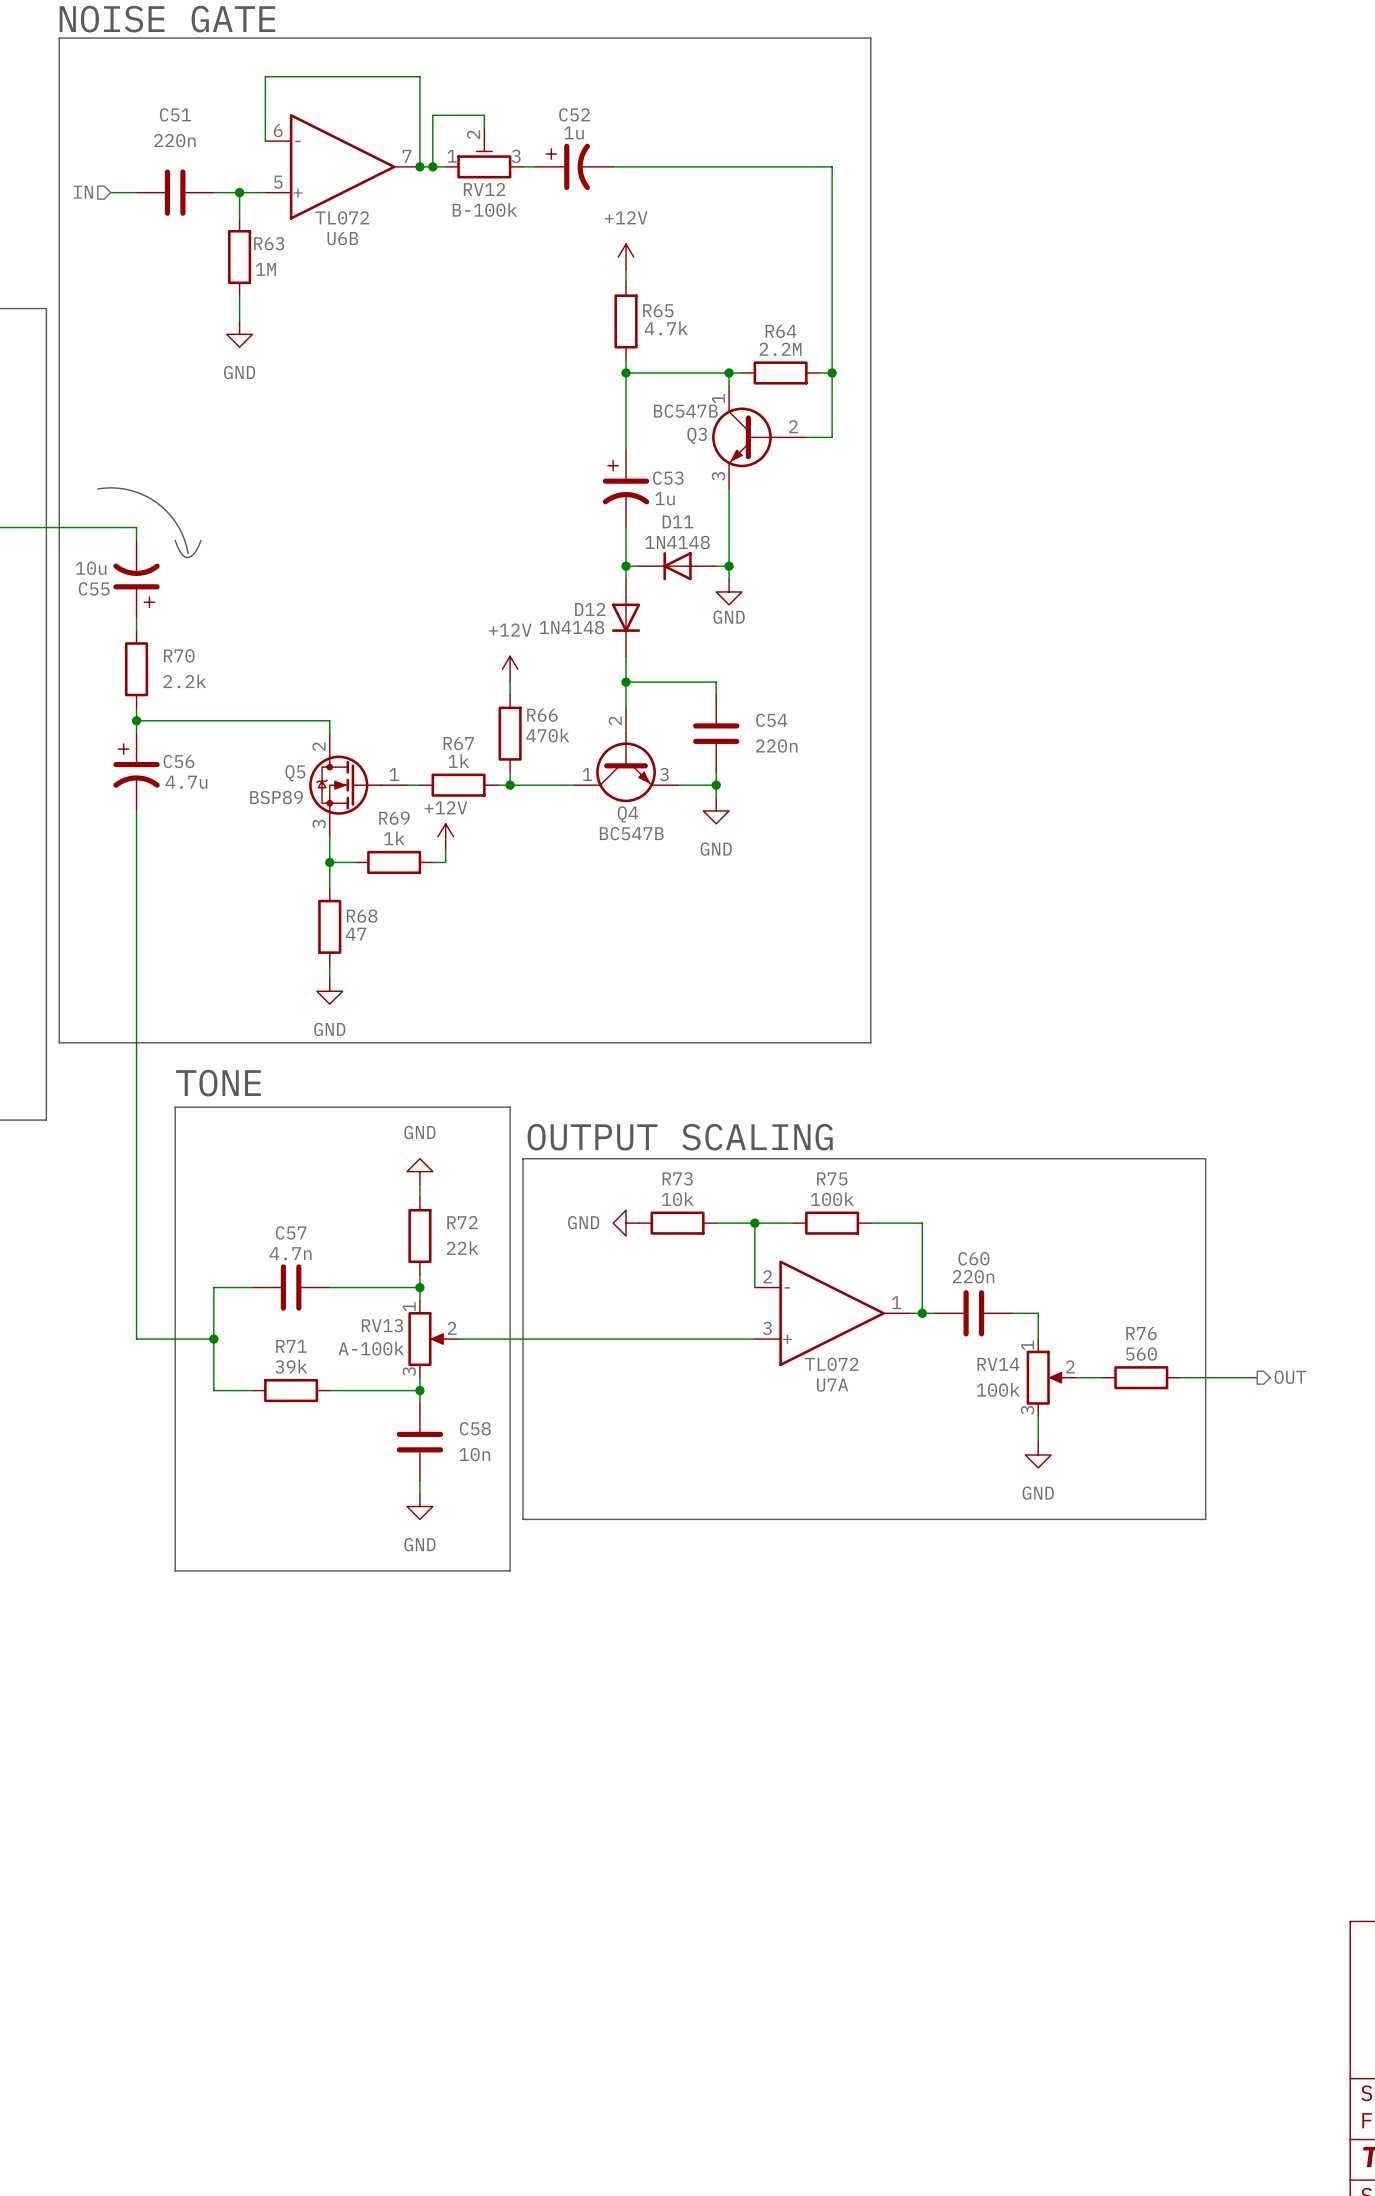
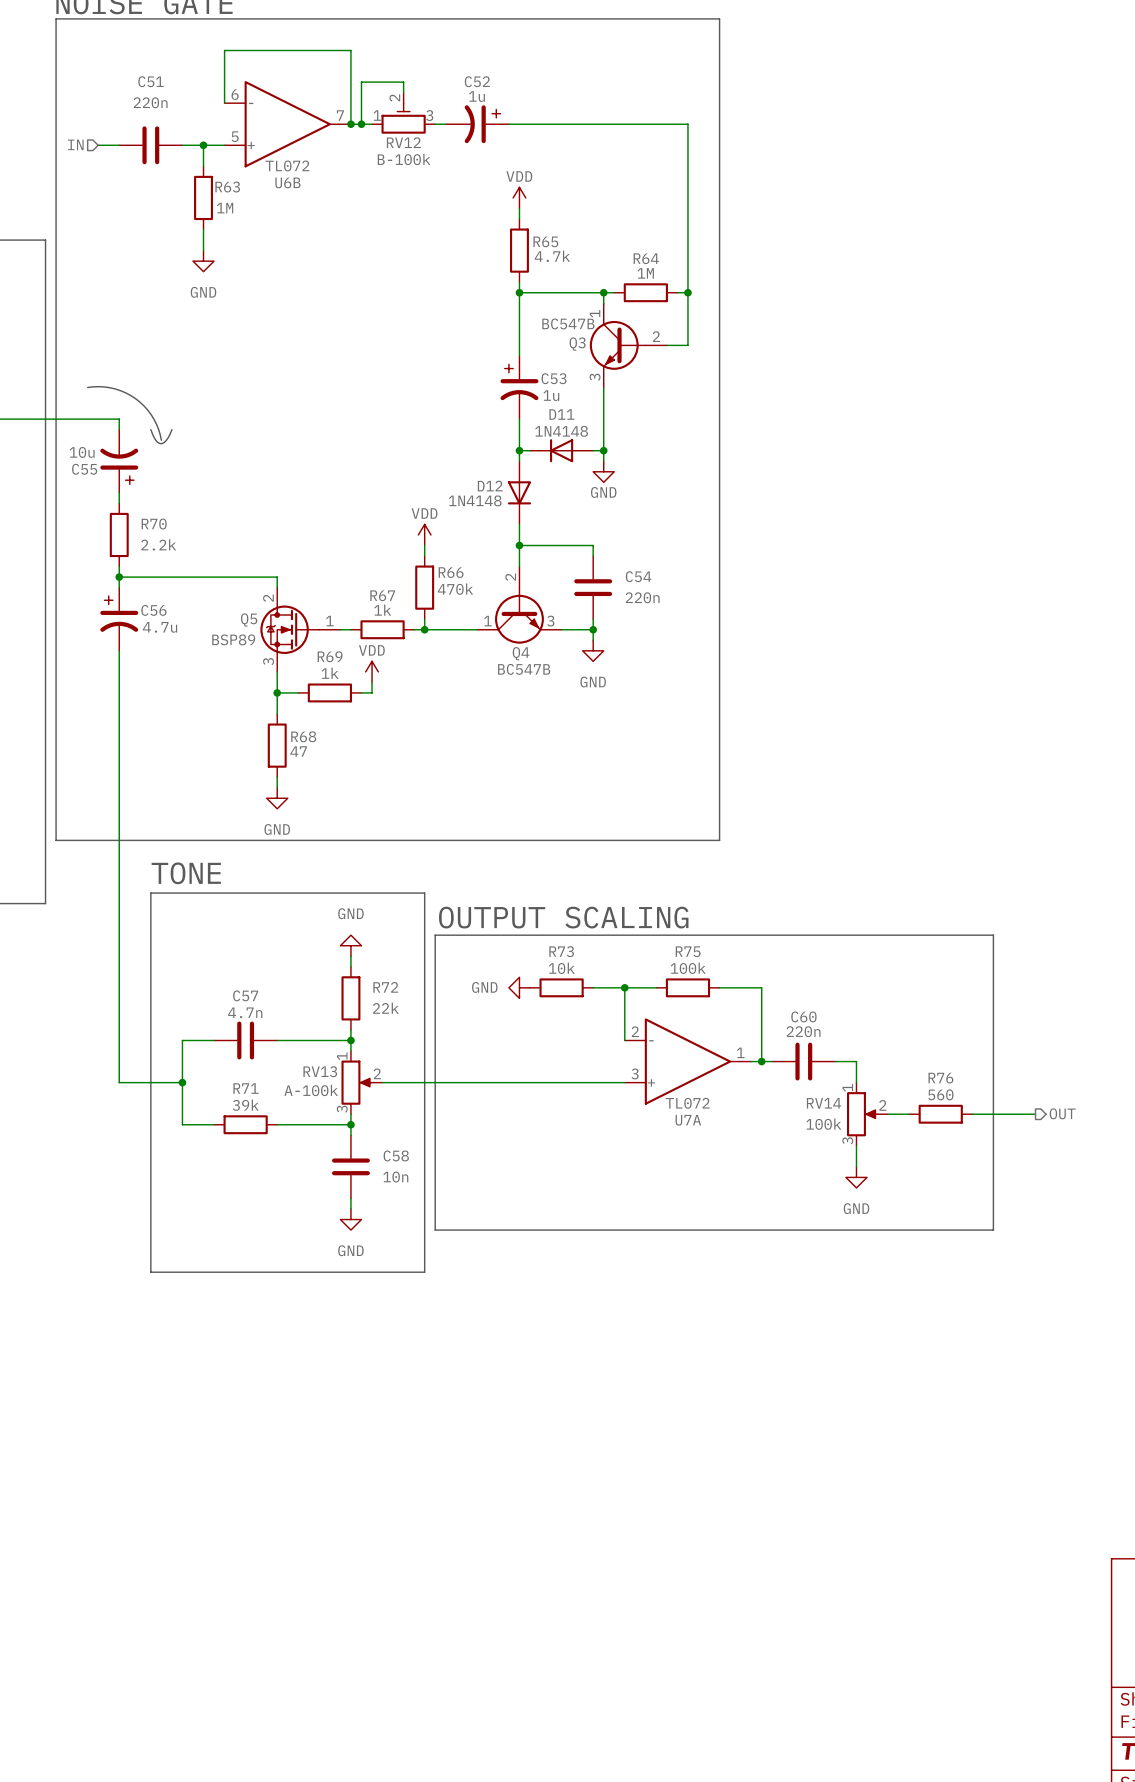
C52 flip: as is (568, 166) -> left-right (482, 124)
power symbol: +12V (626, 257) -> VDD (519, 197)
R64 value: 2.2M (780, 349) -> 1M (645, 273)
power symbol: +12V (510, 669) -> VDD (424, 534)
power symbol: +12V (445, 836) -> VDD (372, 671)

